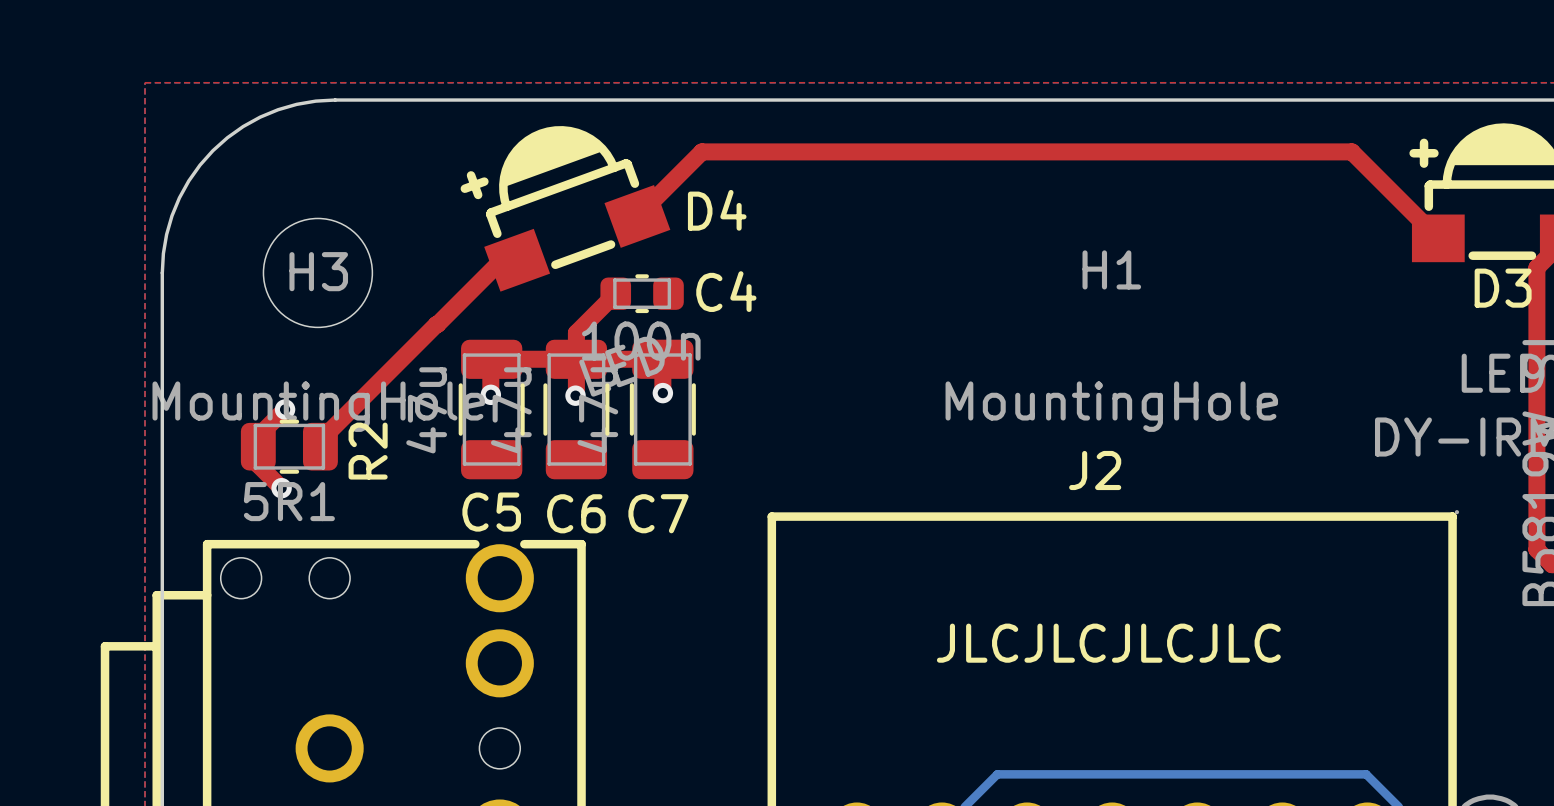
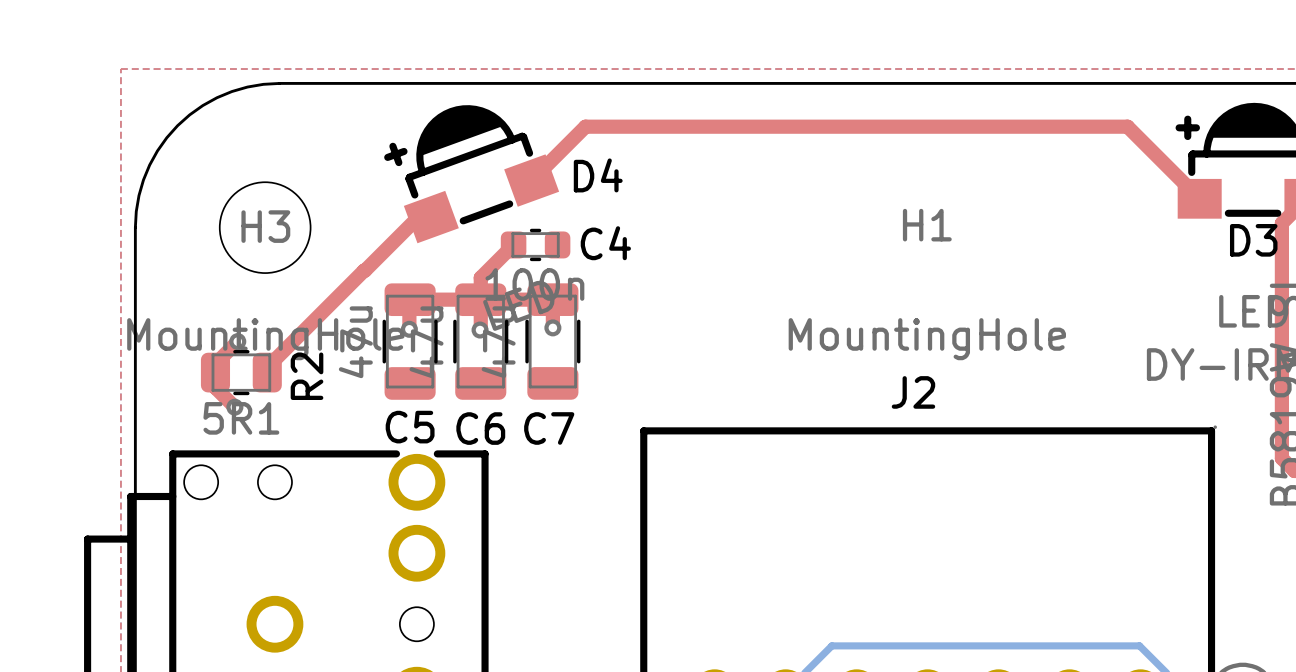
text: JLCJLCJLCJLC (1108, 643) -> none

